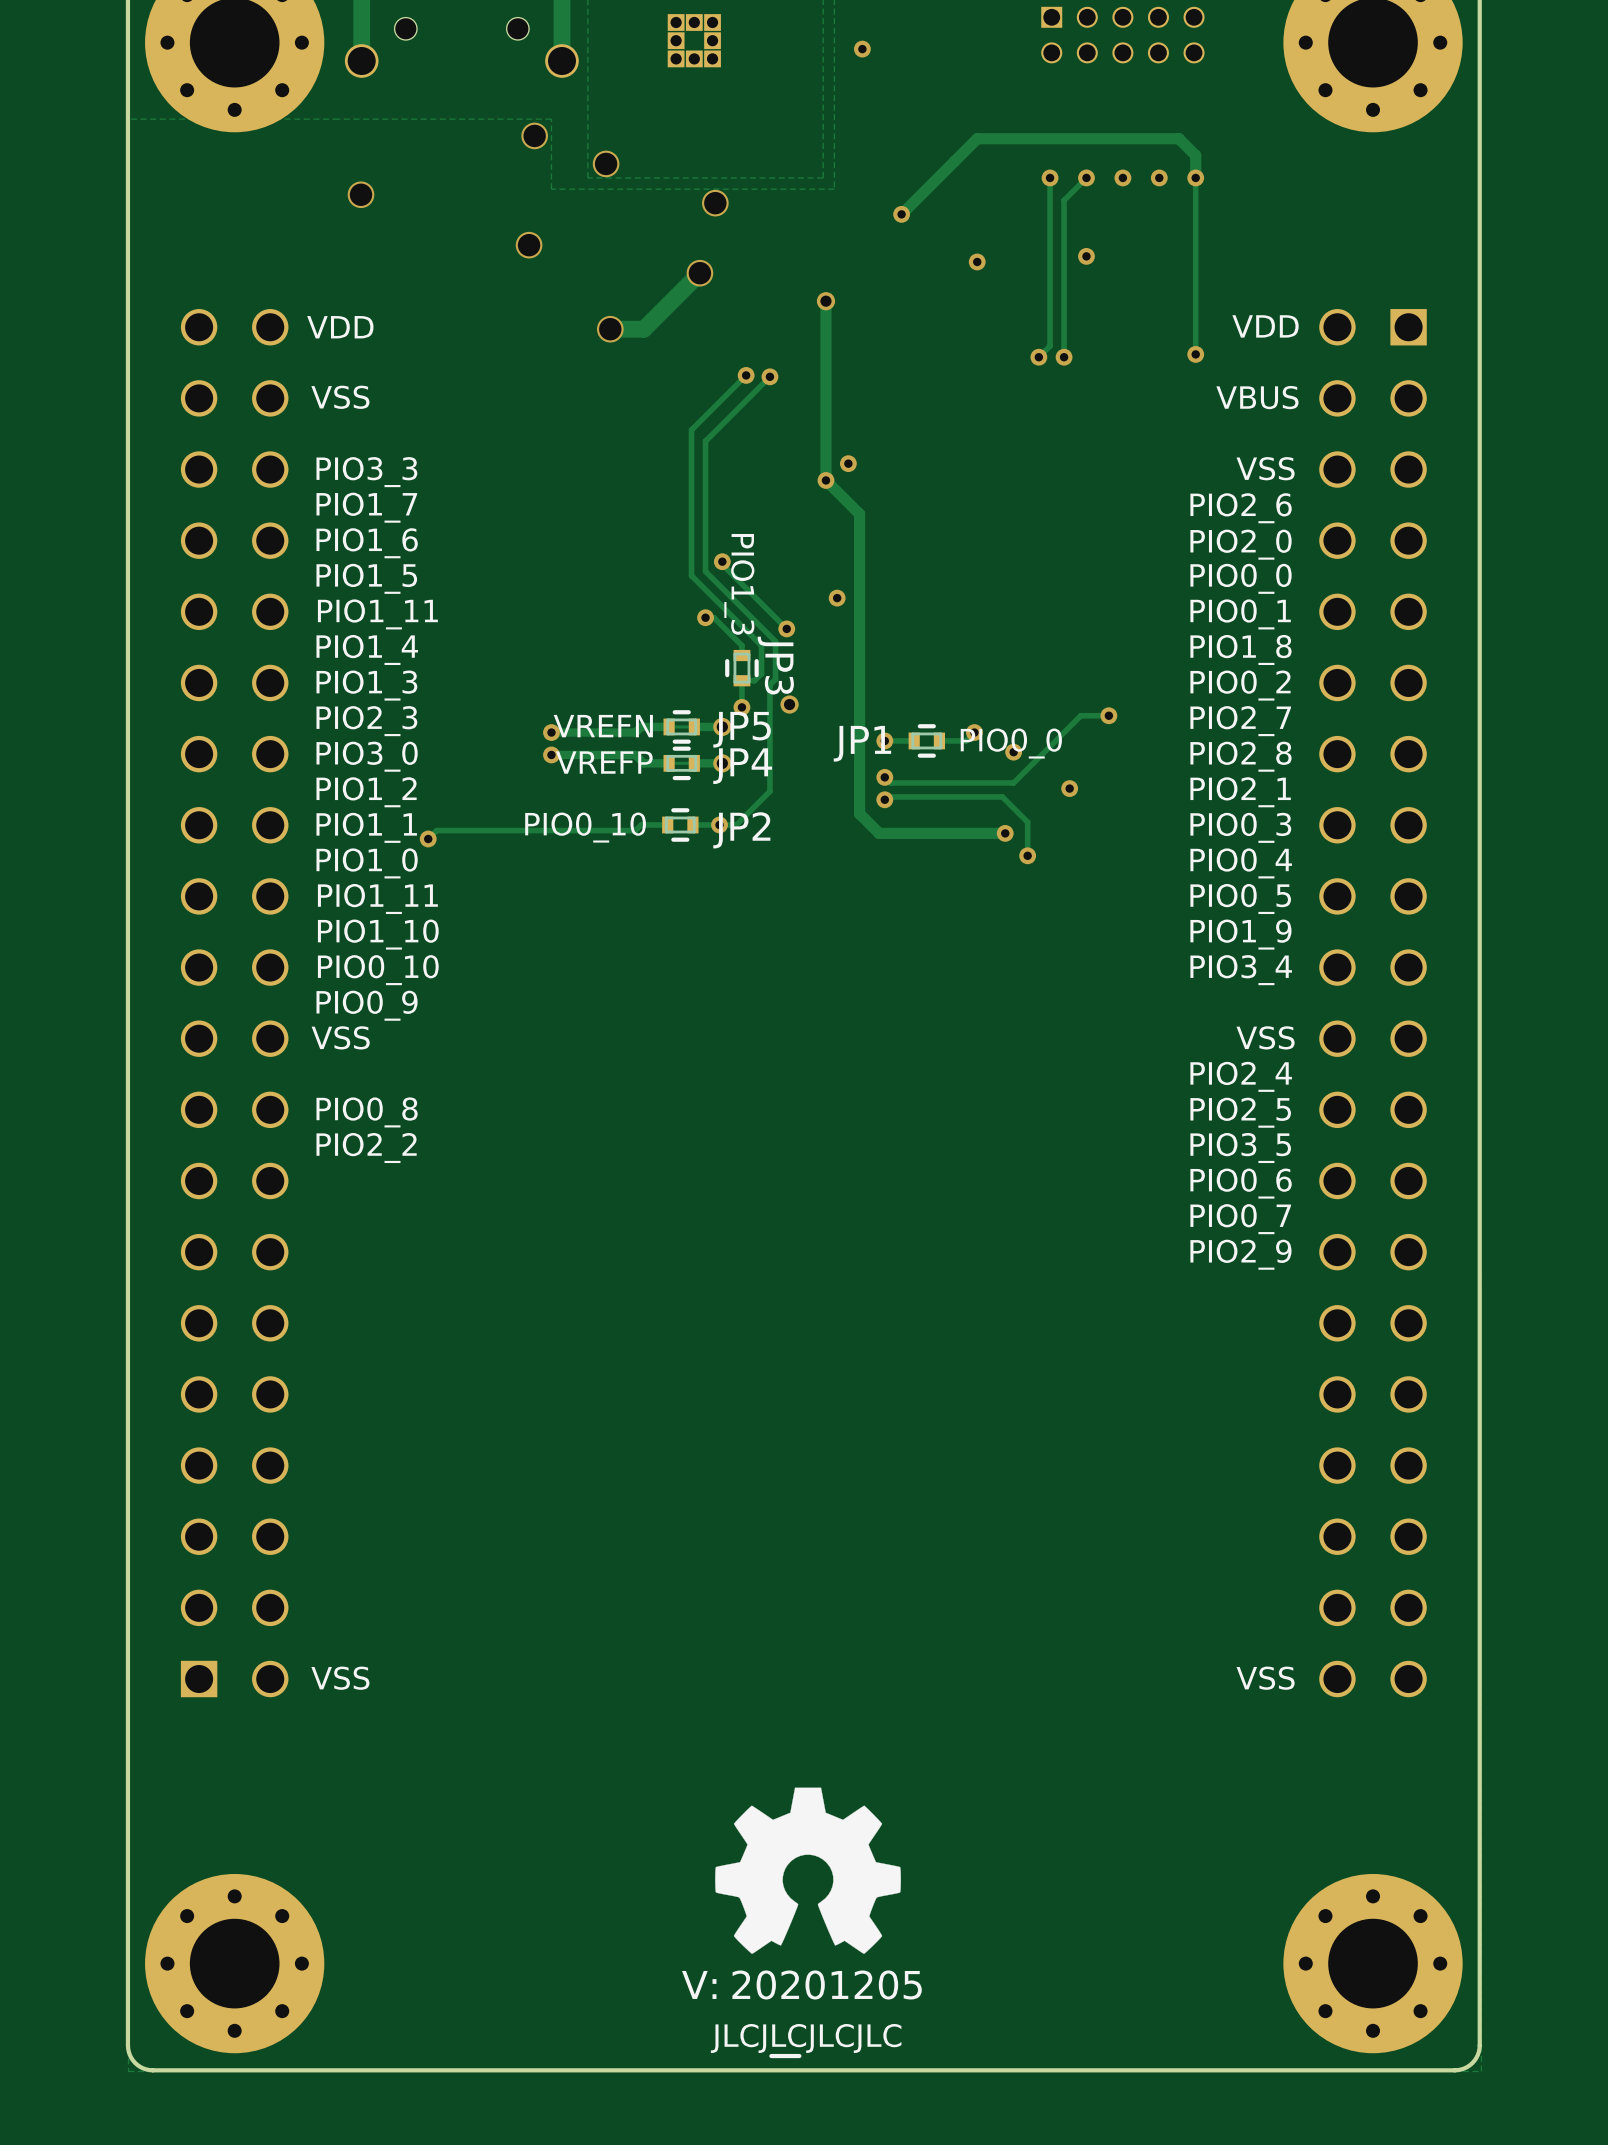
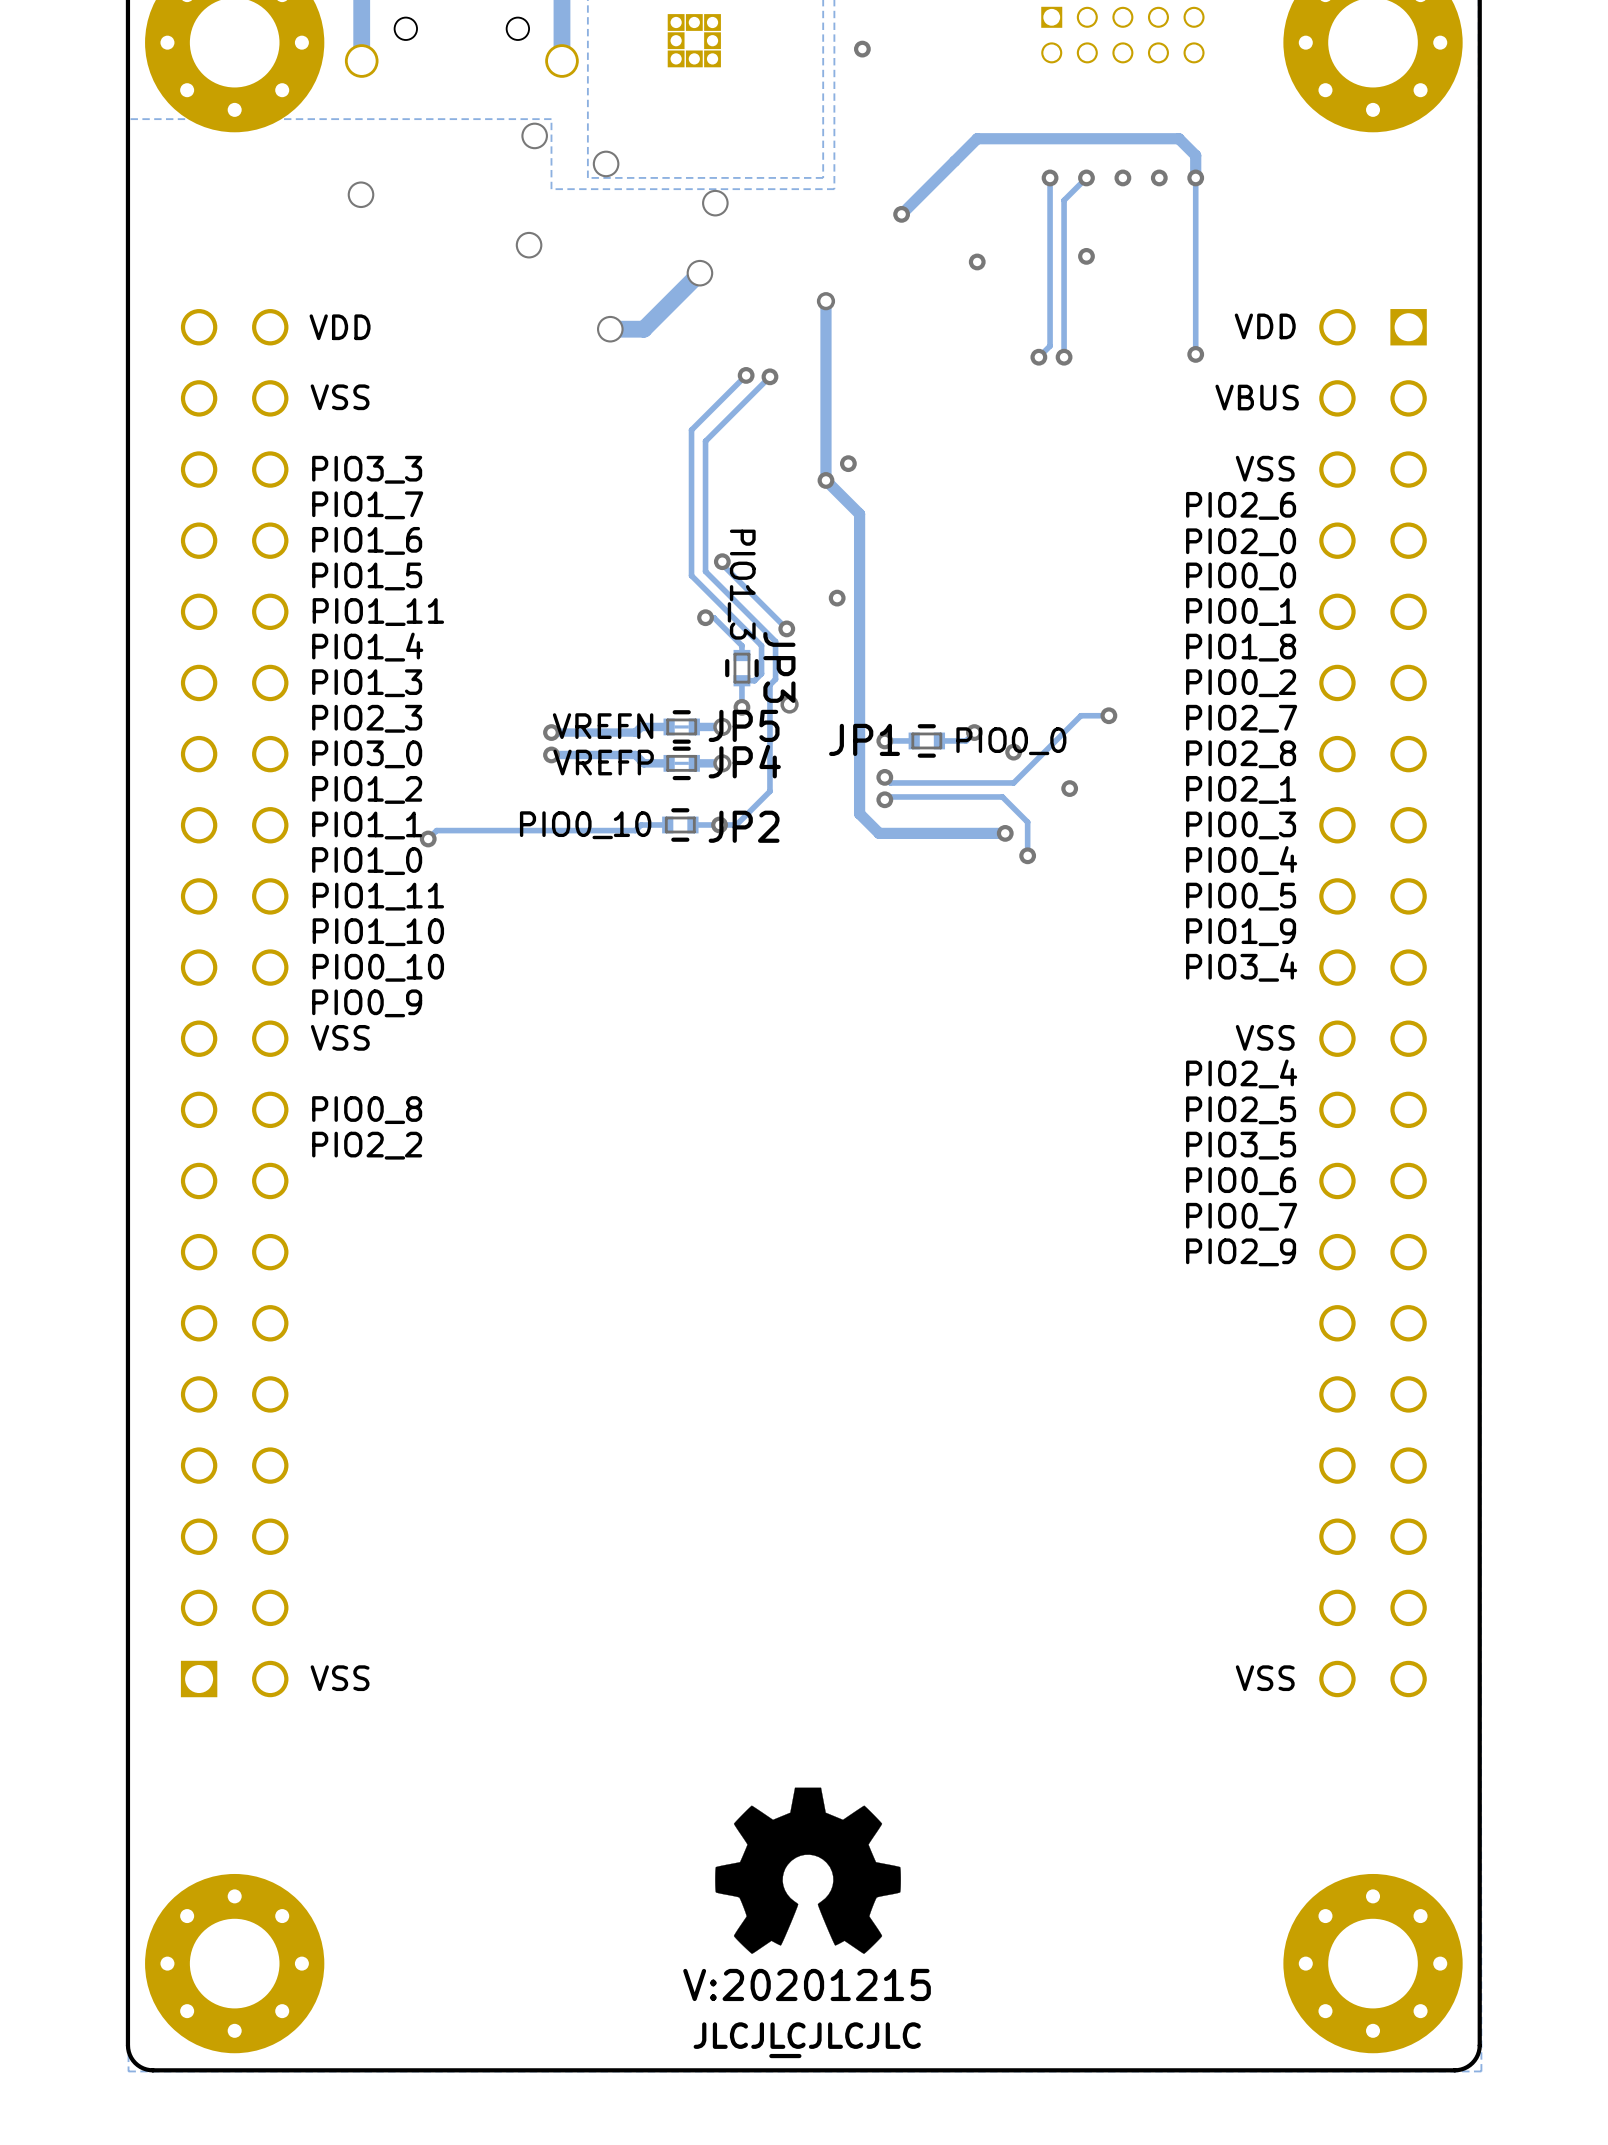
drawing shape: [682, 1970, 922, 2000] -> [683, 1968, 931, 2002]

